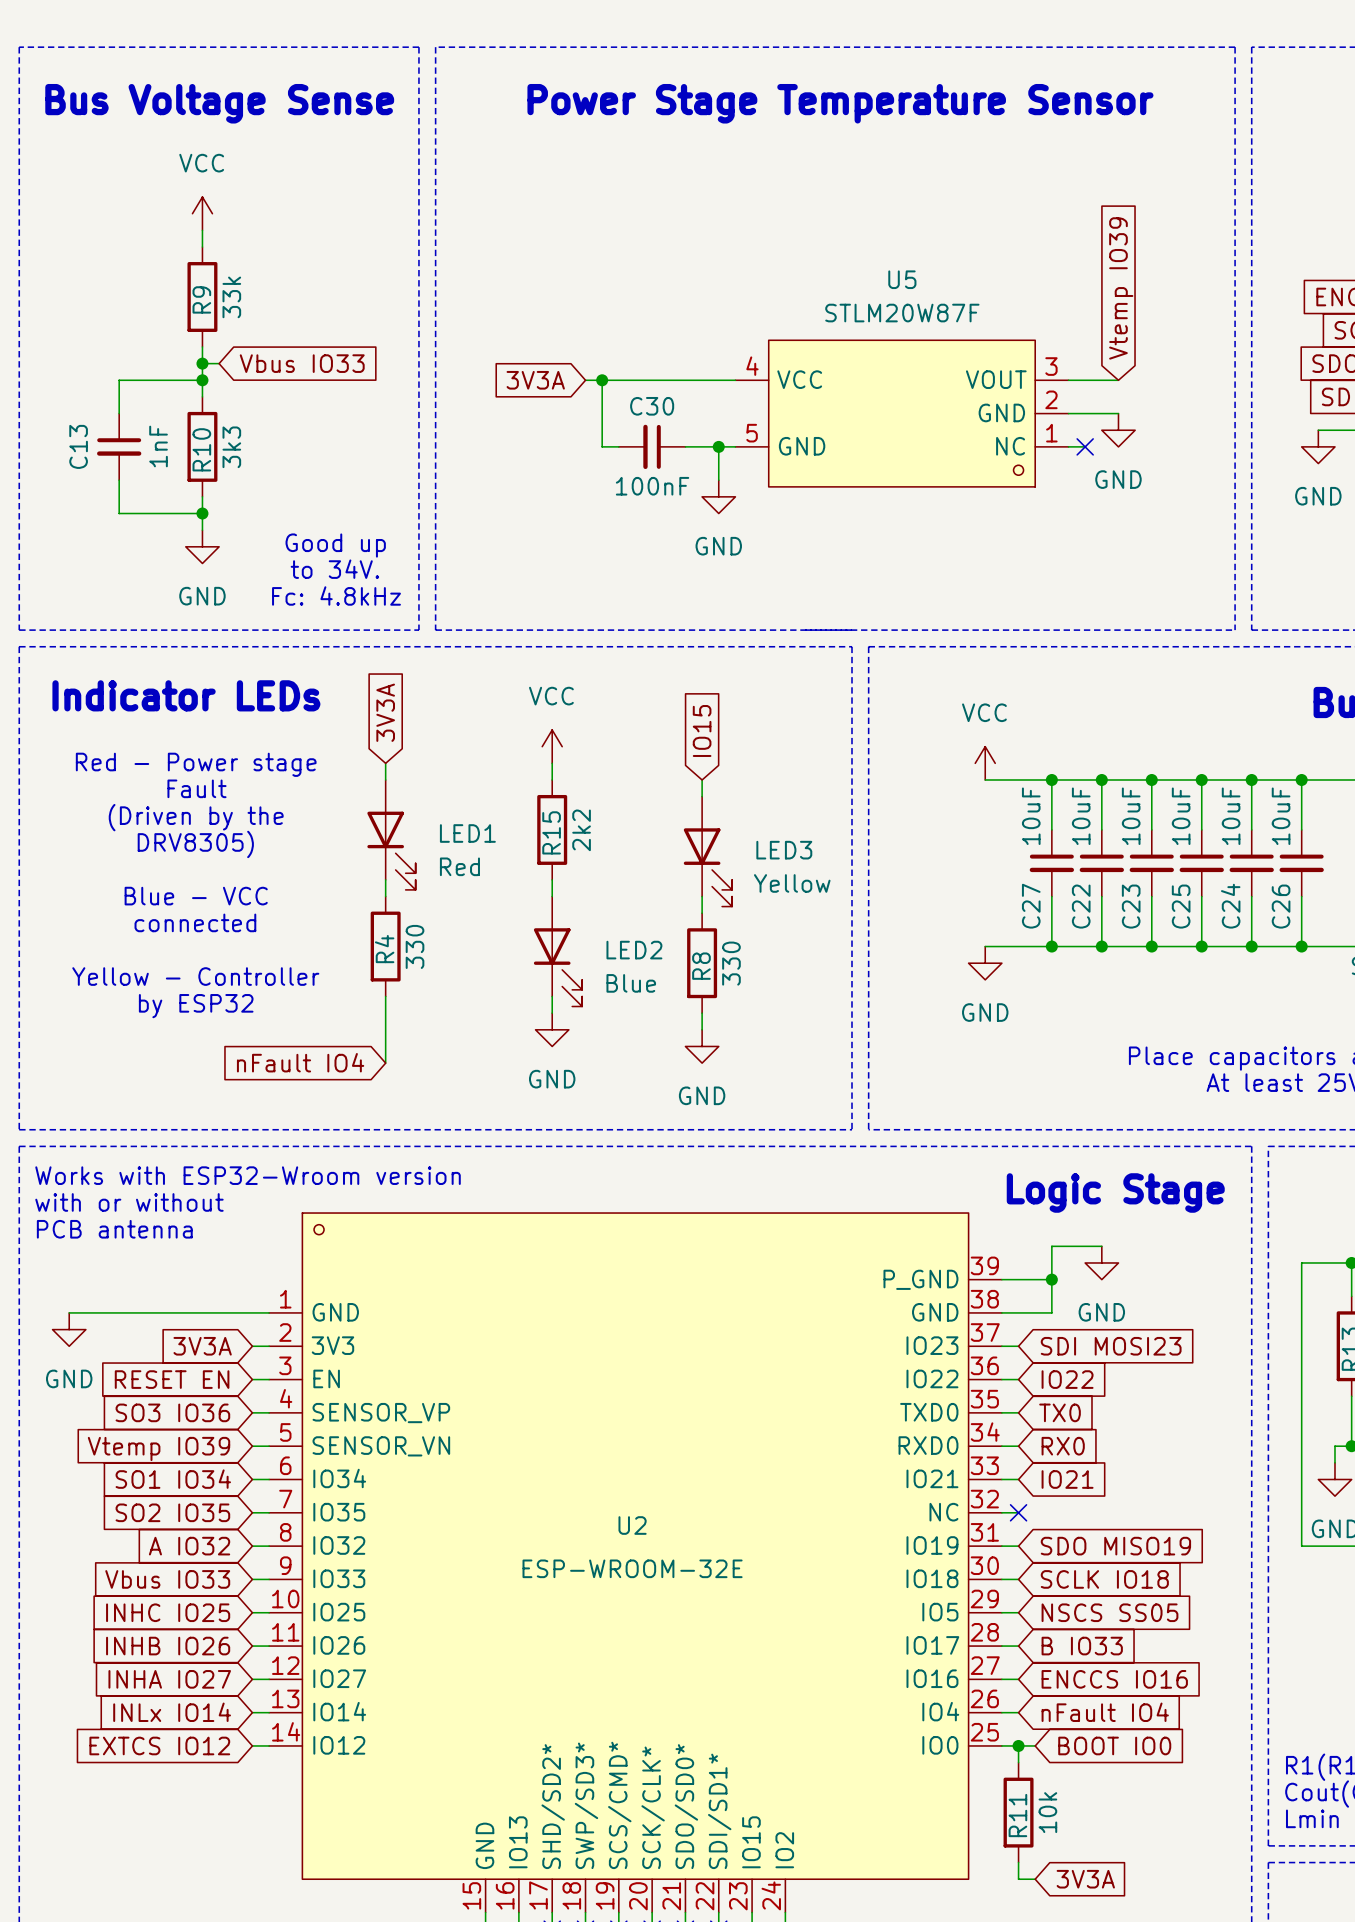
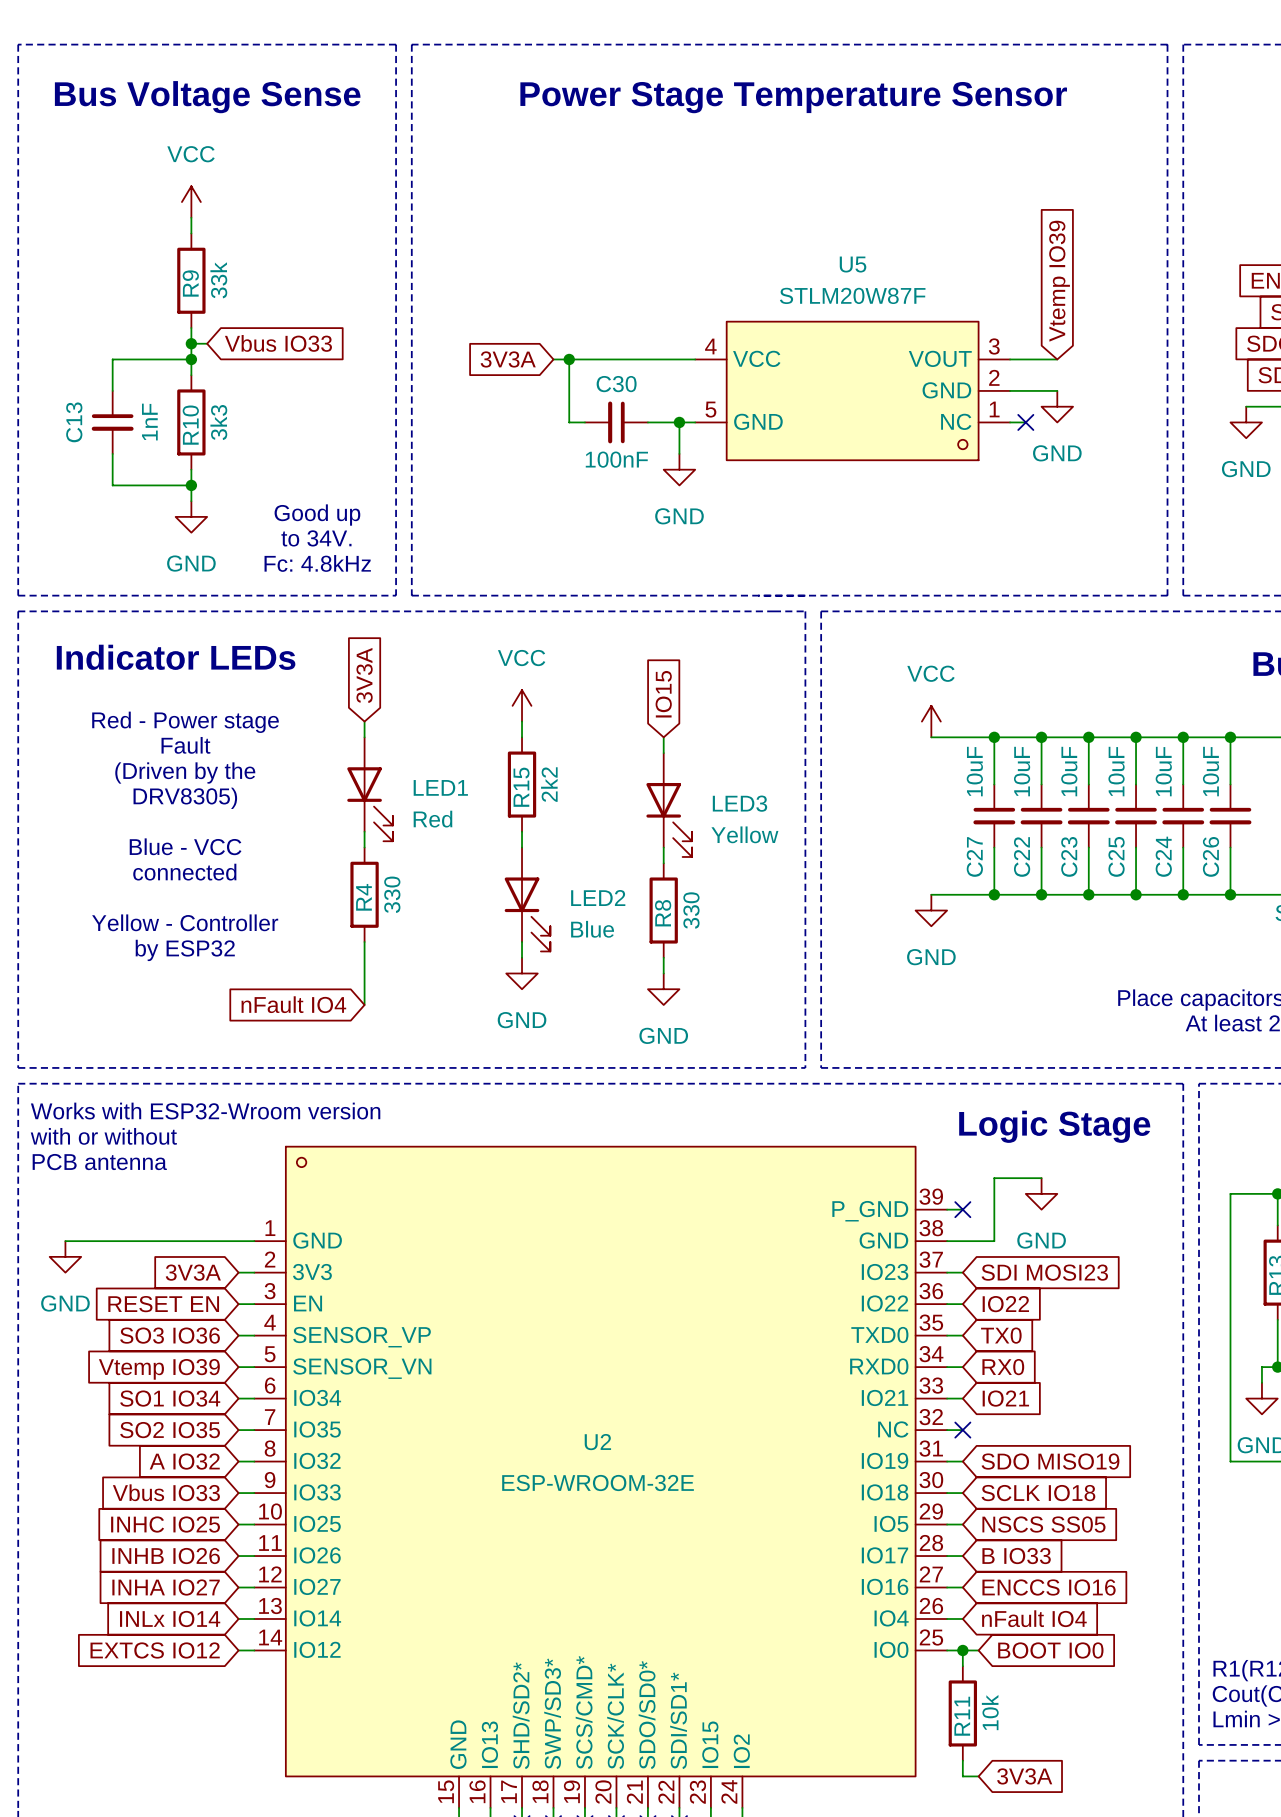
wire: (1018, 1279) (1051, 1279) -> none
no-connect mark: none -> (962, 1209)
junction: (1051, 1279) -> none

